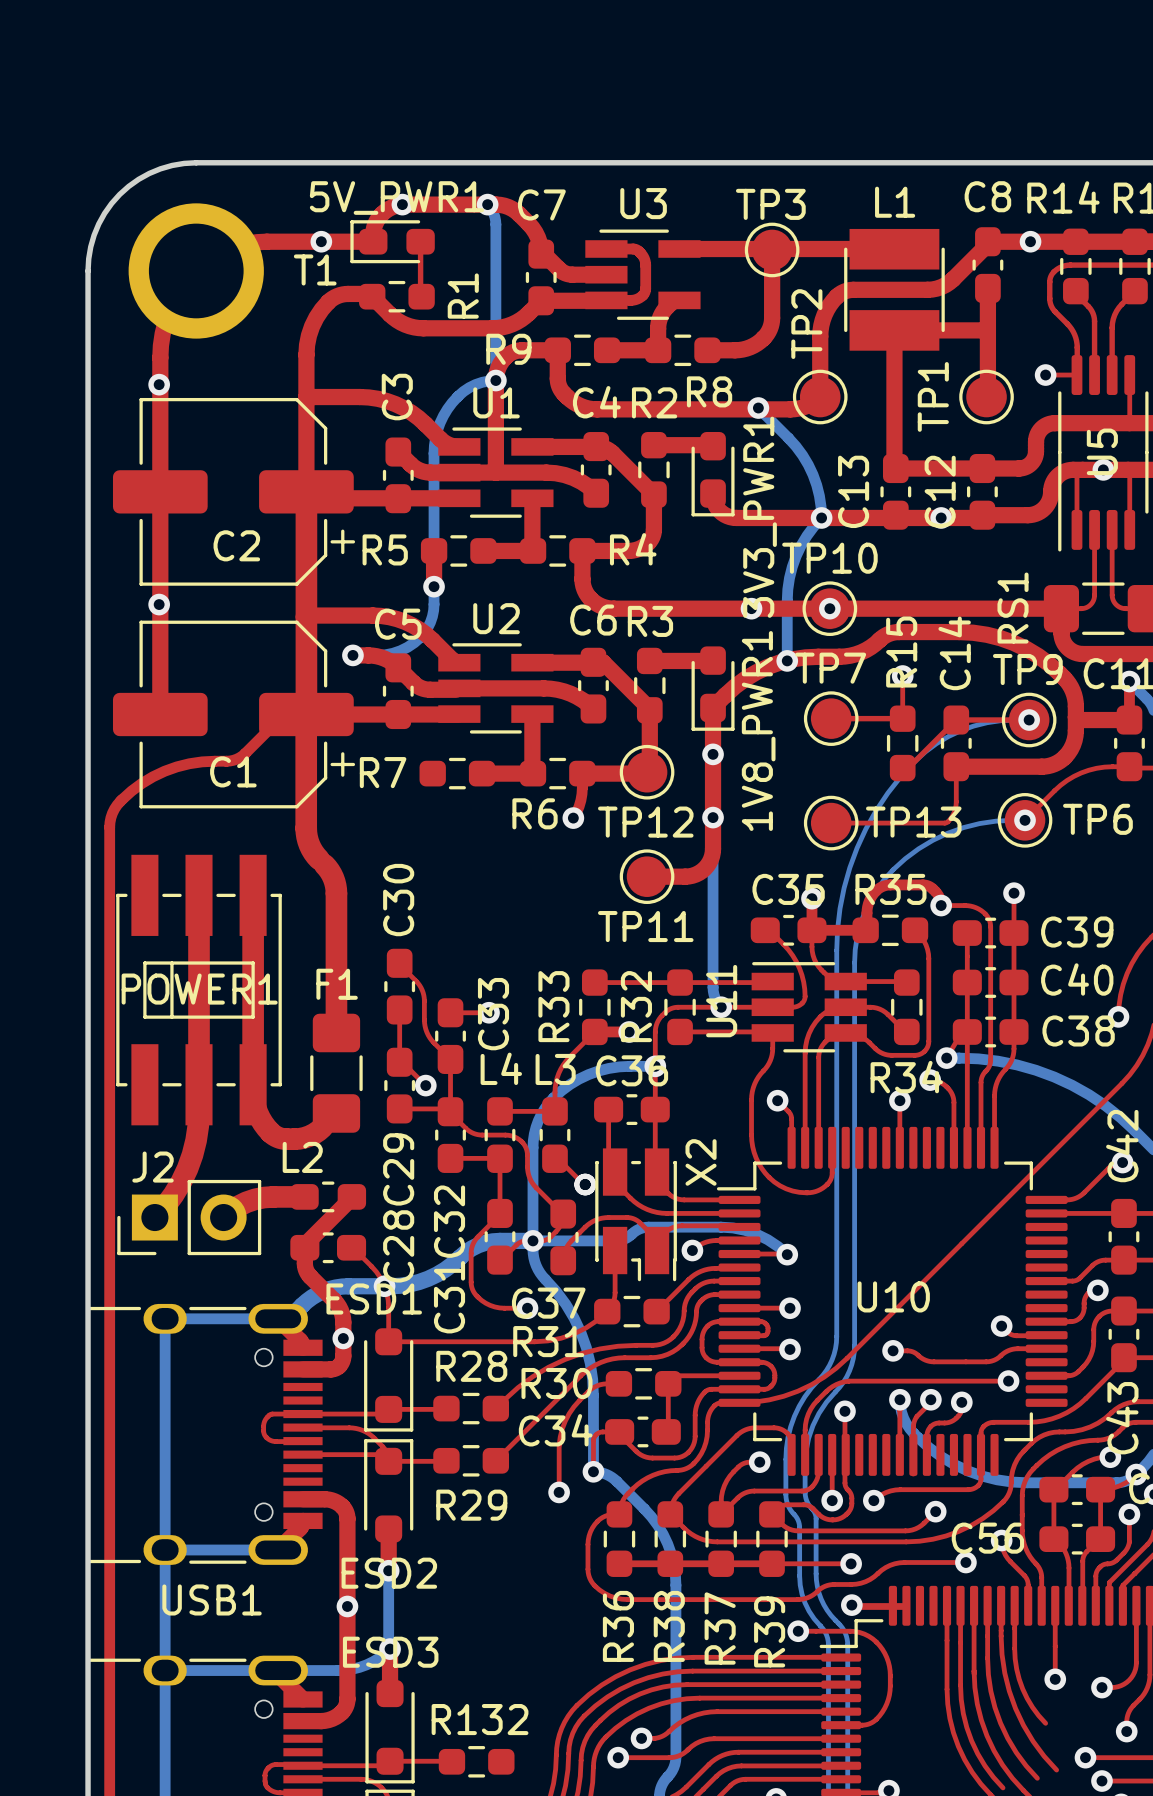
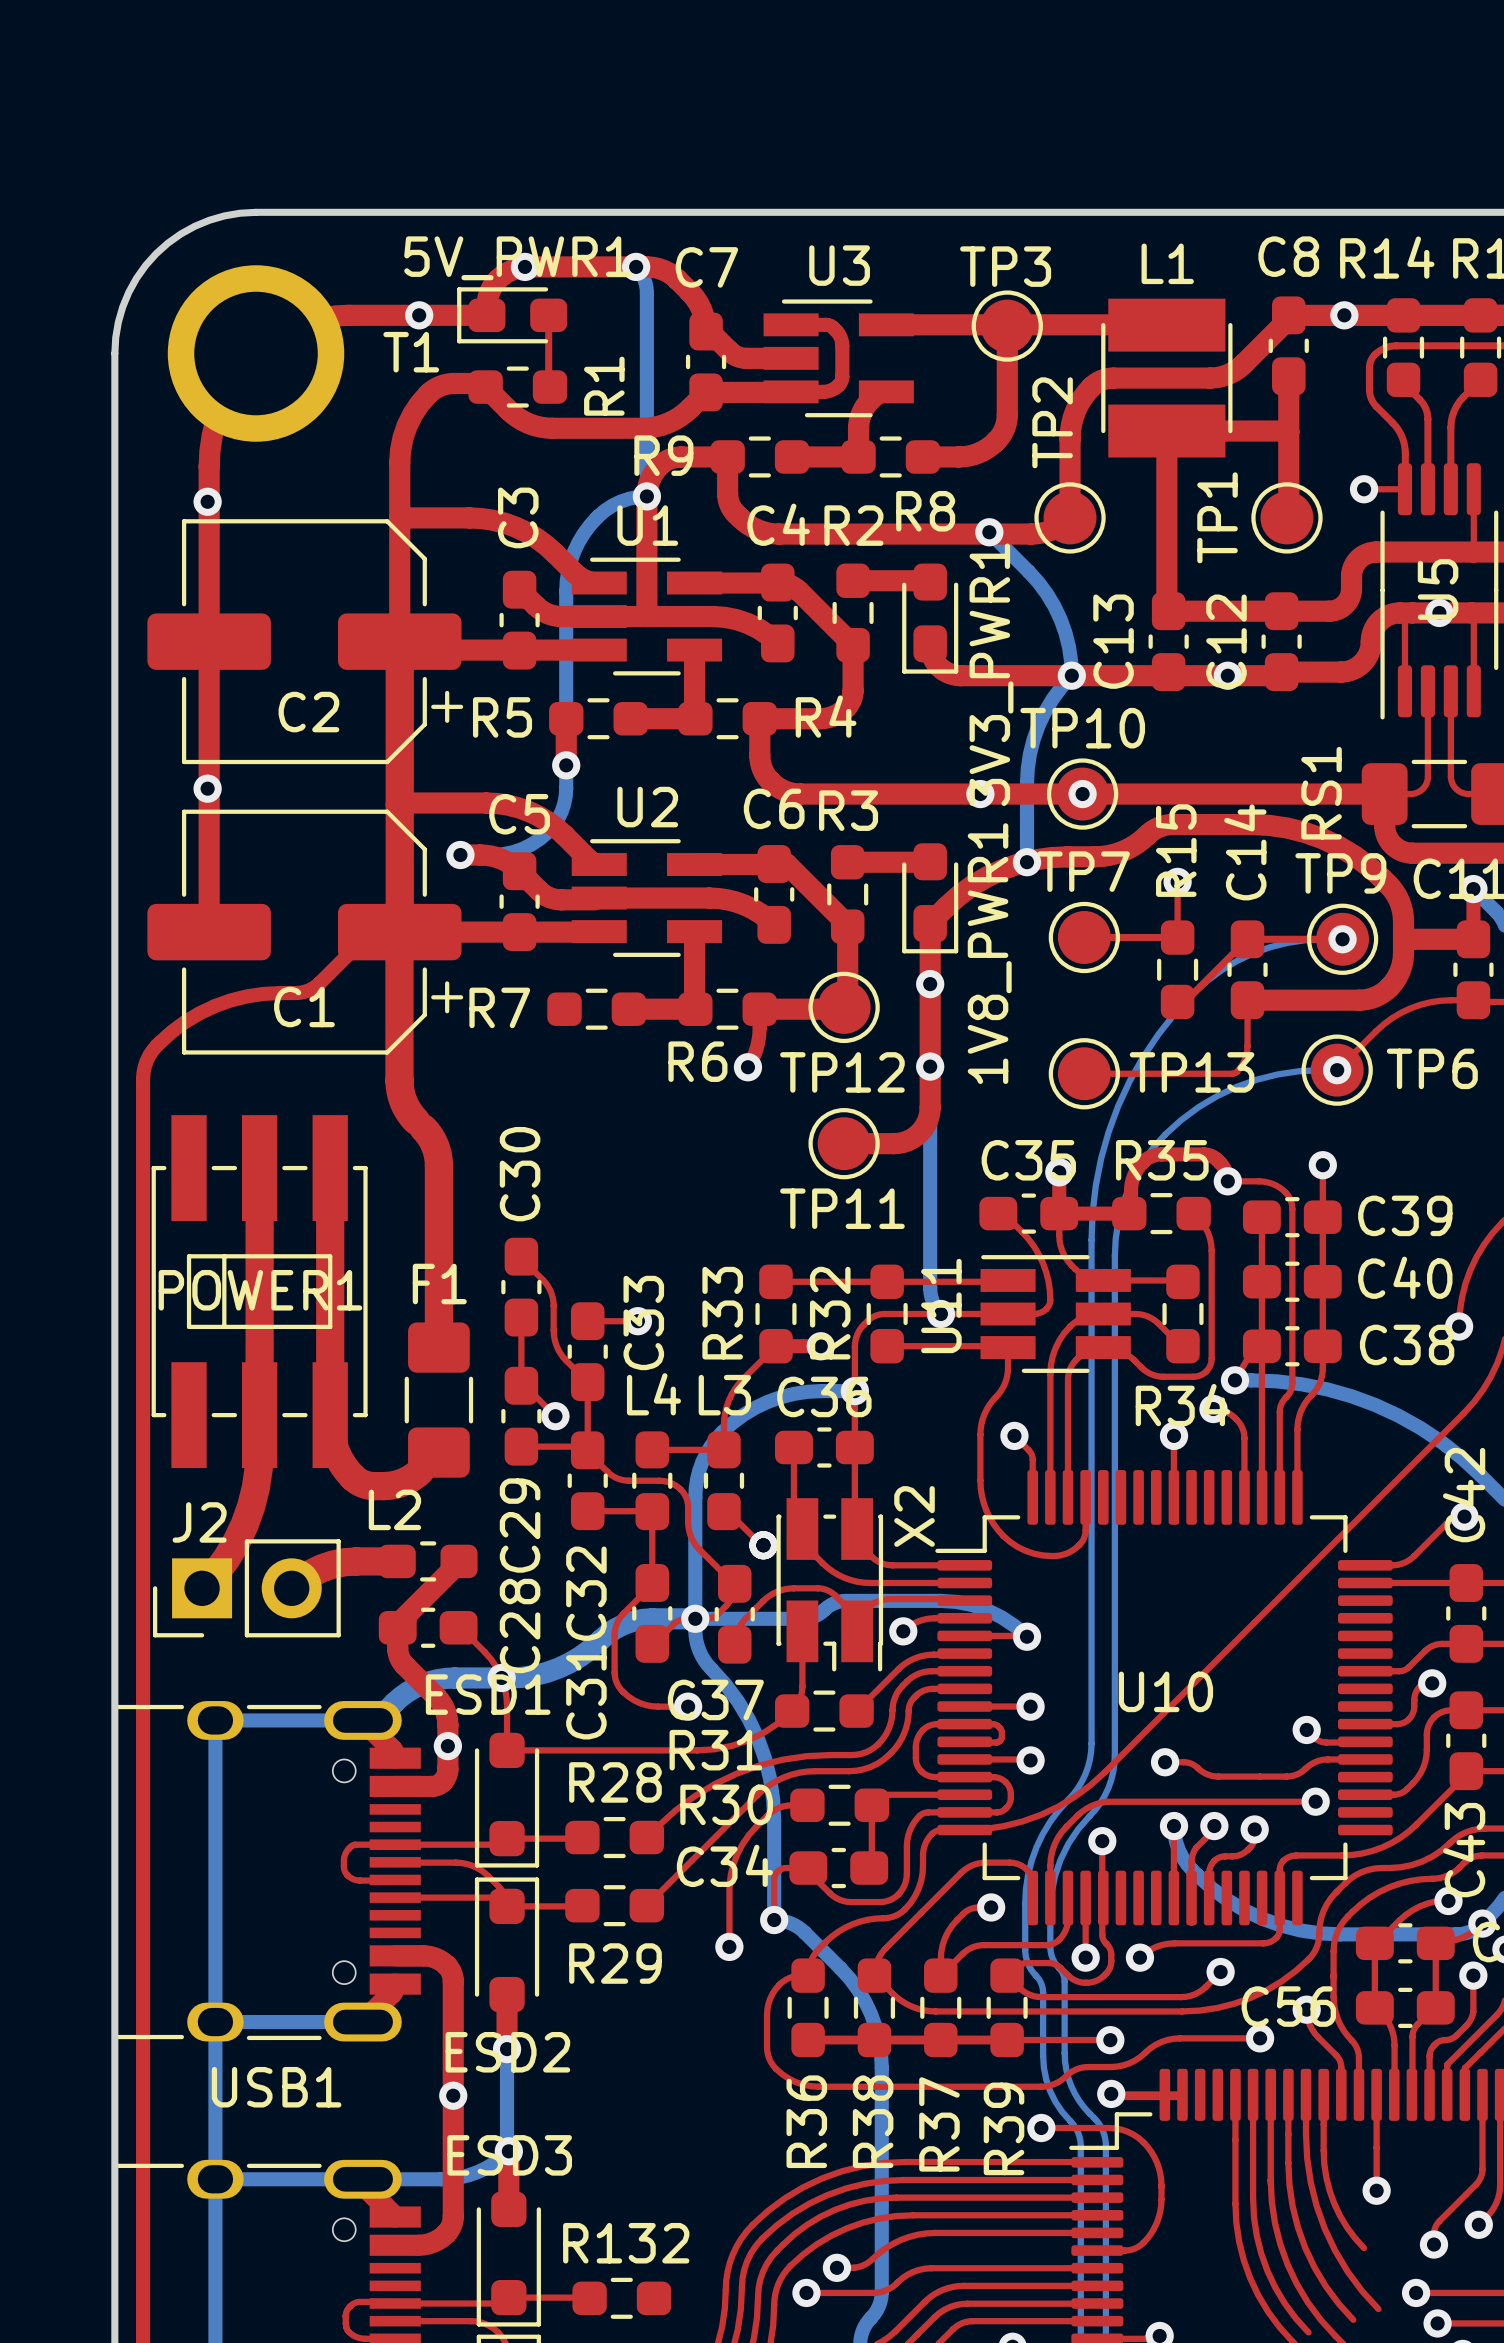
top track: (1136, 1662) (1134, 1672) (1126, 1682) (1118, 1686) (1101, 1687) -> (1482, 2169) (1478, 2182) (1437, 2224) (1434, 2230) (1434, 2244)
via: (1101, 1687) -> none
top track: (1133, 1705) (1127, 1717) (1126, 1732) -> none
via: none -> (1478, 2224)
via: none -> (1434, 2244)
via: (1126, 1731) -> none

